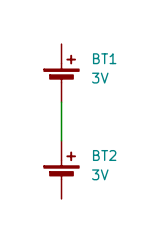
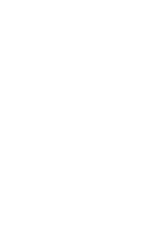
BT1: 3V (61, 73) -> none
wire: (61, 102) (61, 140) -> none
BT2: 3V (61, 169) -> none

